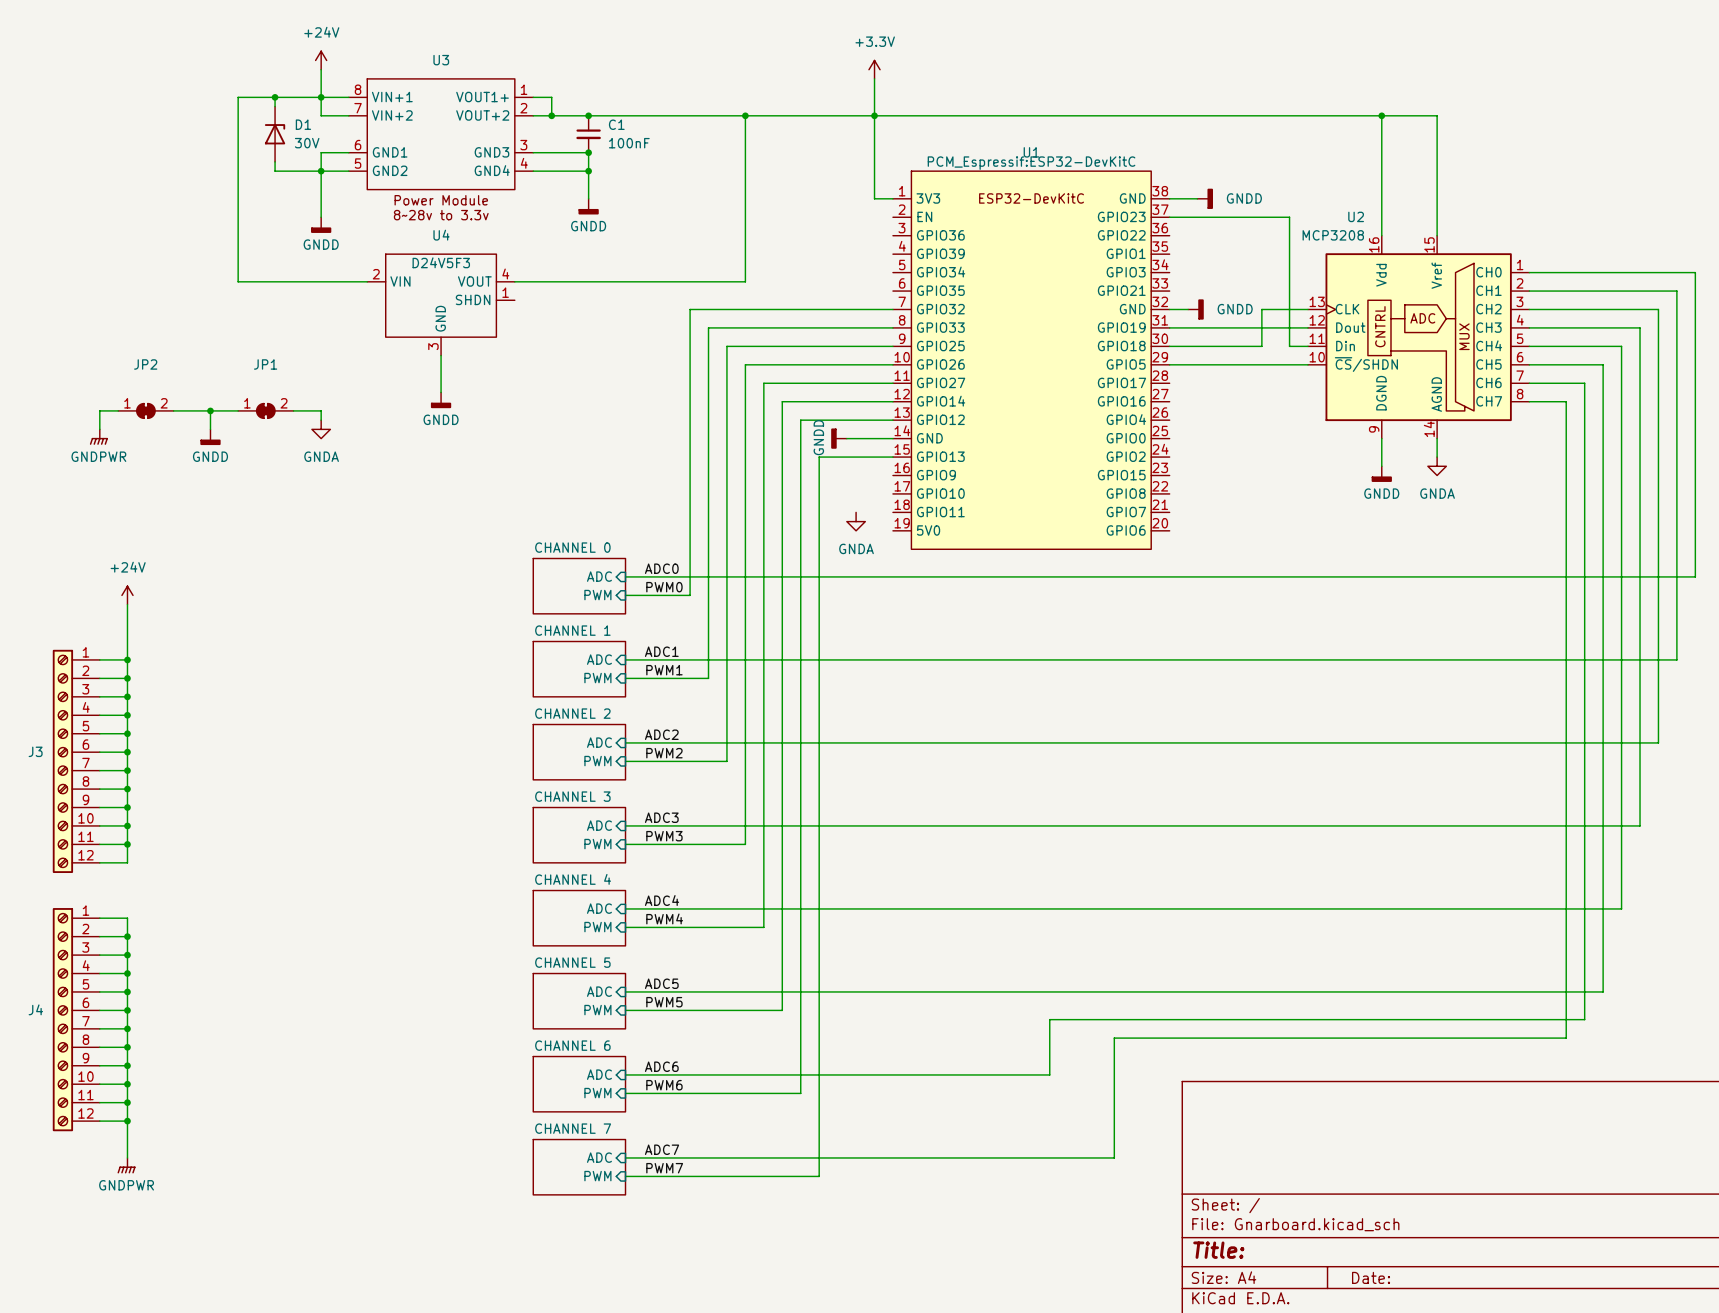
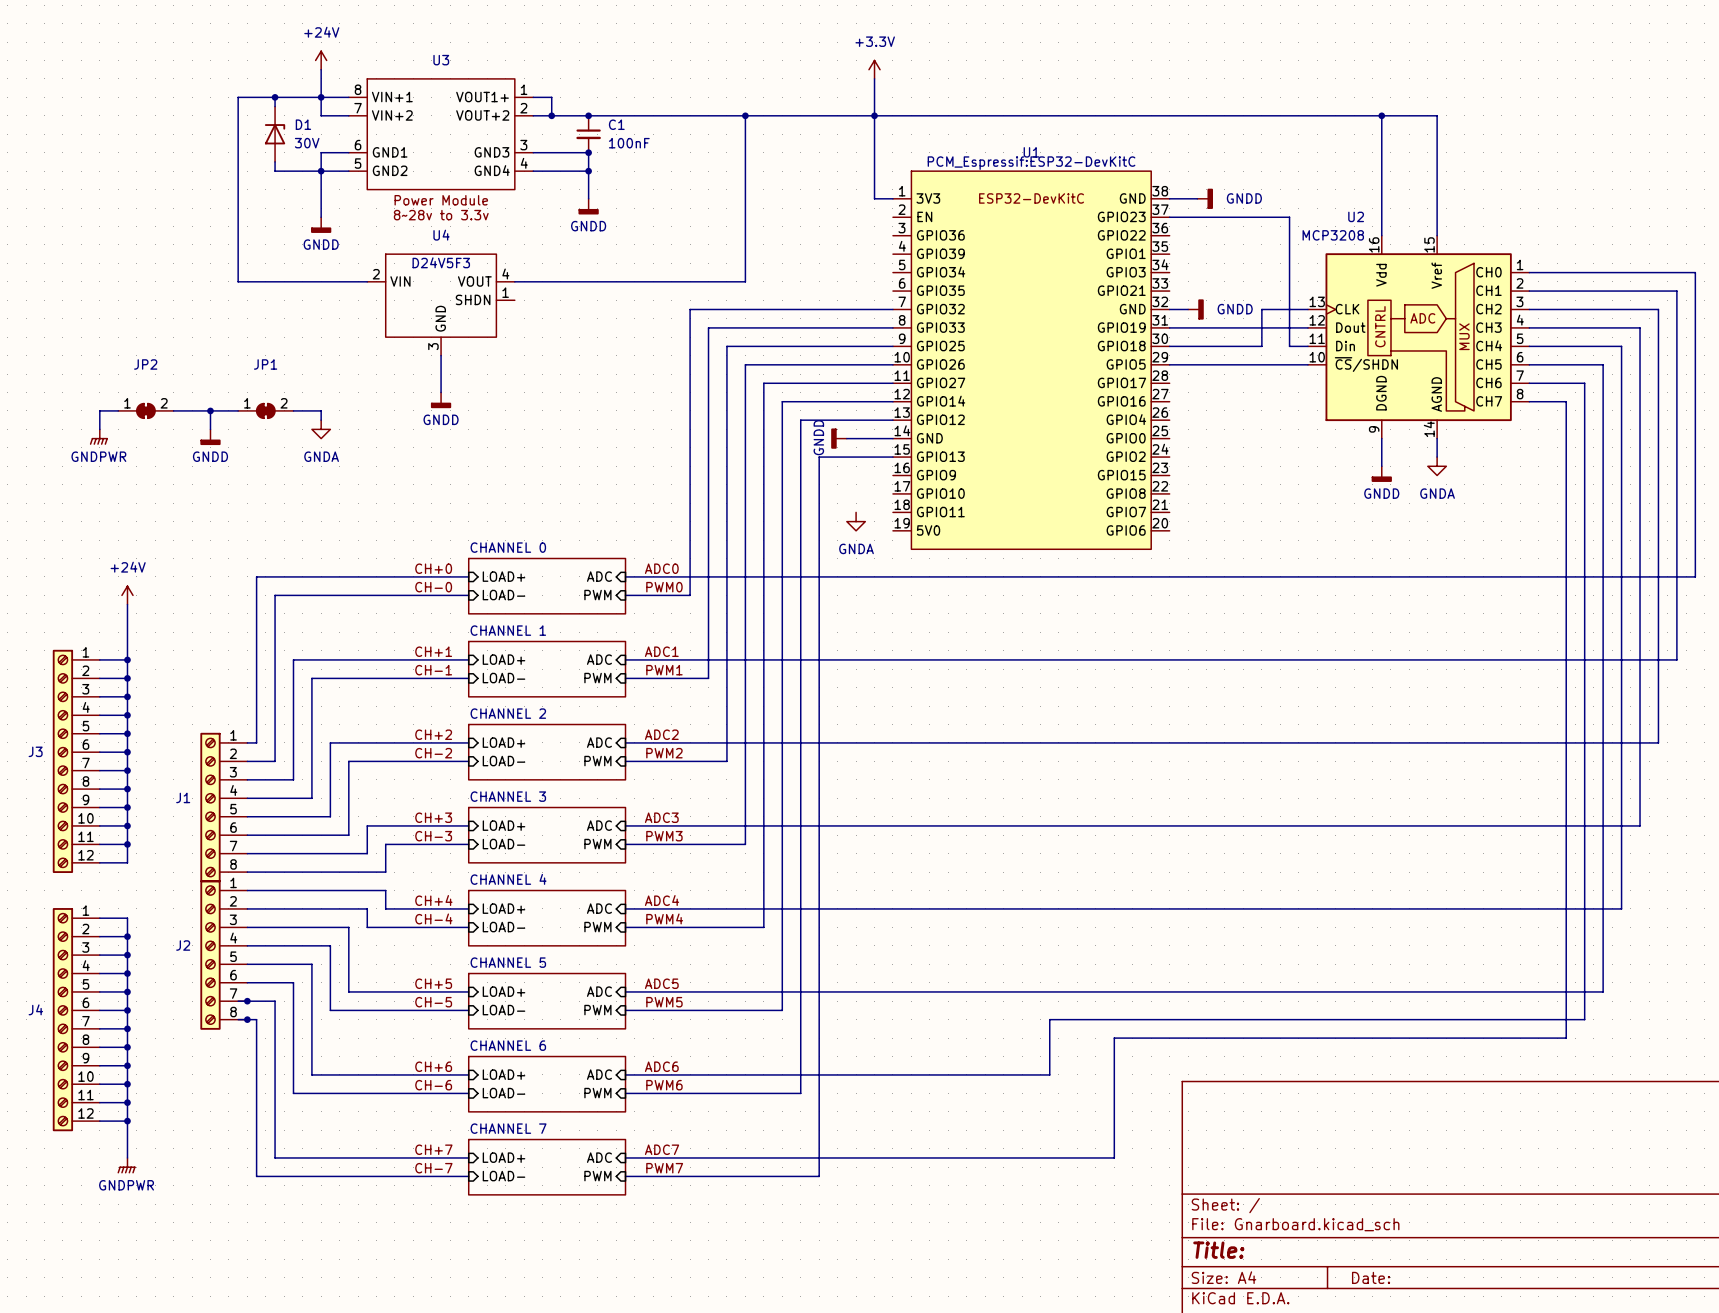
sheet CHANNEL 0 name position: CHANNEL 0 (572, 547) -> CHANNEL 0 (508, 547)
sheet CHANNEL 0 shape: [532, 557, 627, 615] -> [468, 557, 627, 615]
label: none -> CH+0 (433, 568)
wire: none -> (468, 576) (256, 576) (256, 742) (247, 742)
sheet pin: none -> LOAD+ (504, 576)
label: none -> CH-0 (433, 587)
wire: none -> (468, 595) (275, 595) (275, 761) (247, 761)
sheet pin: none -> LOAD- (504, 595)
sheet CHANNEL 1 name position: CHANNEL 1 (572, 630) -> CHANNEL 1 (508, 630)
sheet CHANNEL 1 shape: [532, 640, 627, 698] -> [468, 640, 627, 698]
label: none -> CH+1 (433, 651)
wire: none -> (468, 659) (293, 659) (293, 779) (247, 779)
sheet pin: none -> LOAD+ (504, 659)
label: none -> CH-1 (433, 670)
wire: none -> (468, 678) (311, 678) (311, 798) (247, 798)
sheet pin: none -> LOAD- (504, 678)
sheet CHANNEL 2 name position: CHANNEL 2 (572, 713) -> CHANNEL 2 (508, 713)
sheet CHANNEL 2 shape: [532, 723, 627, 781] -> [468, 723, 627, 781]
label: none -> CH+2 (433, 734)
wire: none -> (468, 742) (330, 742) (330, 816) (247, 816)
sheet pin: none -> LOAD+ (504, 742)
label: none -> CH-2 (433, 753)
wire: none -> (468, 761) (348, 761) (348, 835) (247, 835)
sheet pin: none -> LOAD- (504, 761)
sheet CHANNEL 3 name position: CHANNEL 3 (572, 796) -> CHANNEL 3 (508, 796)
sheet CHANNEL 3 shape: [532, 806, 627, 864] -> [468, 806, 627, 864]
J1: none -> (223, 807)
label: none -> CH+3 (433, 817)
wire: none -> (468, 825) (367, 825) (367, 853) (247, 853)
sheet pin: none -> LOAD+ (504, 825)
label: none -> CH-3 (433, 836)
wire: none -> (468, 844) (385, 844) (385, 872) (247, 872)
sheet pin: none -> LOAD- (504, 844)
sheet CHANNEL 4 name position: CHANNEL 4 (573, 879) -> CHANNEL 4 (508, 879)
sheet CHANNEL 4 shape: [532, 889, 627, 947] -> [468, 889, 627, 947]
wire: none -> (247, 890) (385, 890) (385, 908) (468, 908)
label: none -> CH+4 (433, 900)
wire: none -> (247, 908) (367, 908) (367, 927) (468, 927)
sheet pin: none -> LOAD+ (504, 908)
label: none -> CH-4 (433, 918)
wire: none -> (247, 927) (348, 927) (348, 991) (468, 991)
sheet pin: none -> LOAD- (504, 927)
wire: none -> (247, 945) (330, 945) (330, 1010) (468, 1010)
J2: none -> (223, 955)
sheet CHANNEL 5 name position: CHANNEL 5 (572, 962) -> CHANNEL 5 (508, 962)
wire: none -> (247, 964) (311, 964) (311, 1074) (468, 1074)
sheet CHANNEL 5 shape: [532, 972, 627, 1030] -> [468, 972, 627, 1030]
wire: none -> (247, 982) (293, 982) (293, 1093) (468, 1093)
label: none -> CH+5 (433, 983)
sheet pin: none -> LOAD+ (504, 991)
wire: none -> (238, 1001) (275, 1001) (275, 1157) (468, 1157)
junction: none -> (247, 1001)
label: none -> CH-5 (433, 1002)
sheet pin: none -> LOAD- (504, 1010)
wire: none -> (238, 1019) (256, 1019) (256, 1176) (468, 1176)
junction: none -> (247, 1019)
sheet CHANNEL 6 name position: CHANNEL 6 (572, 1045) -> CHANNEL 6 (508, 1045)
sheet CHANNEL 6 shape: [532, 1055, 627, 1113] -> [468, 1055, 627, 1113]
label: none -> CH+6 (433, 1066)
sheet pin: none -> LOAD+ (504, 1074)
label: none -> CH-6 (433, 1085)
sheet pin: none -> LOAD- (504, 1093)
sheet CHANNEL 7 name position: CHANNEL 7 (573, 1128) -> CHANNEL 7 (508, 1128)
sheet CHANNEL 7 shape: [532, 1138, 627, 1196] -> [468, 1138, 627, 1196]
label: none -> CH+7 (433, 1149)
sheet pin: none -> LOAD+ (504, 1157)
label: none -> CH-7 (433, 1168)
sheet pin: none -> LOAD- (504, 1176)

